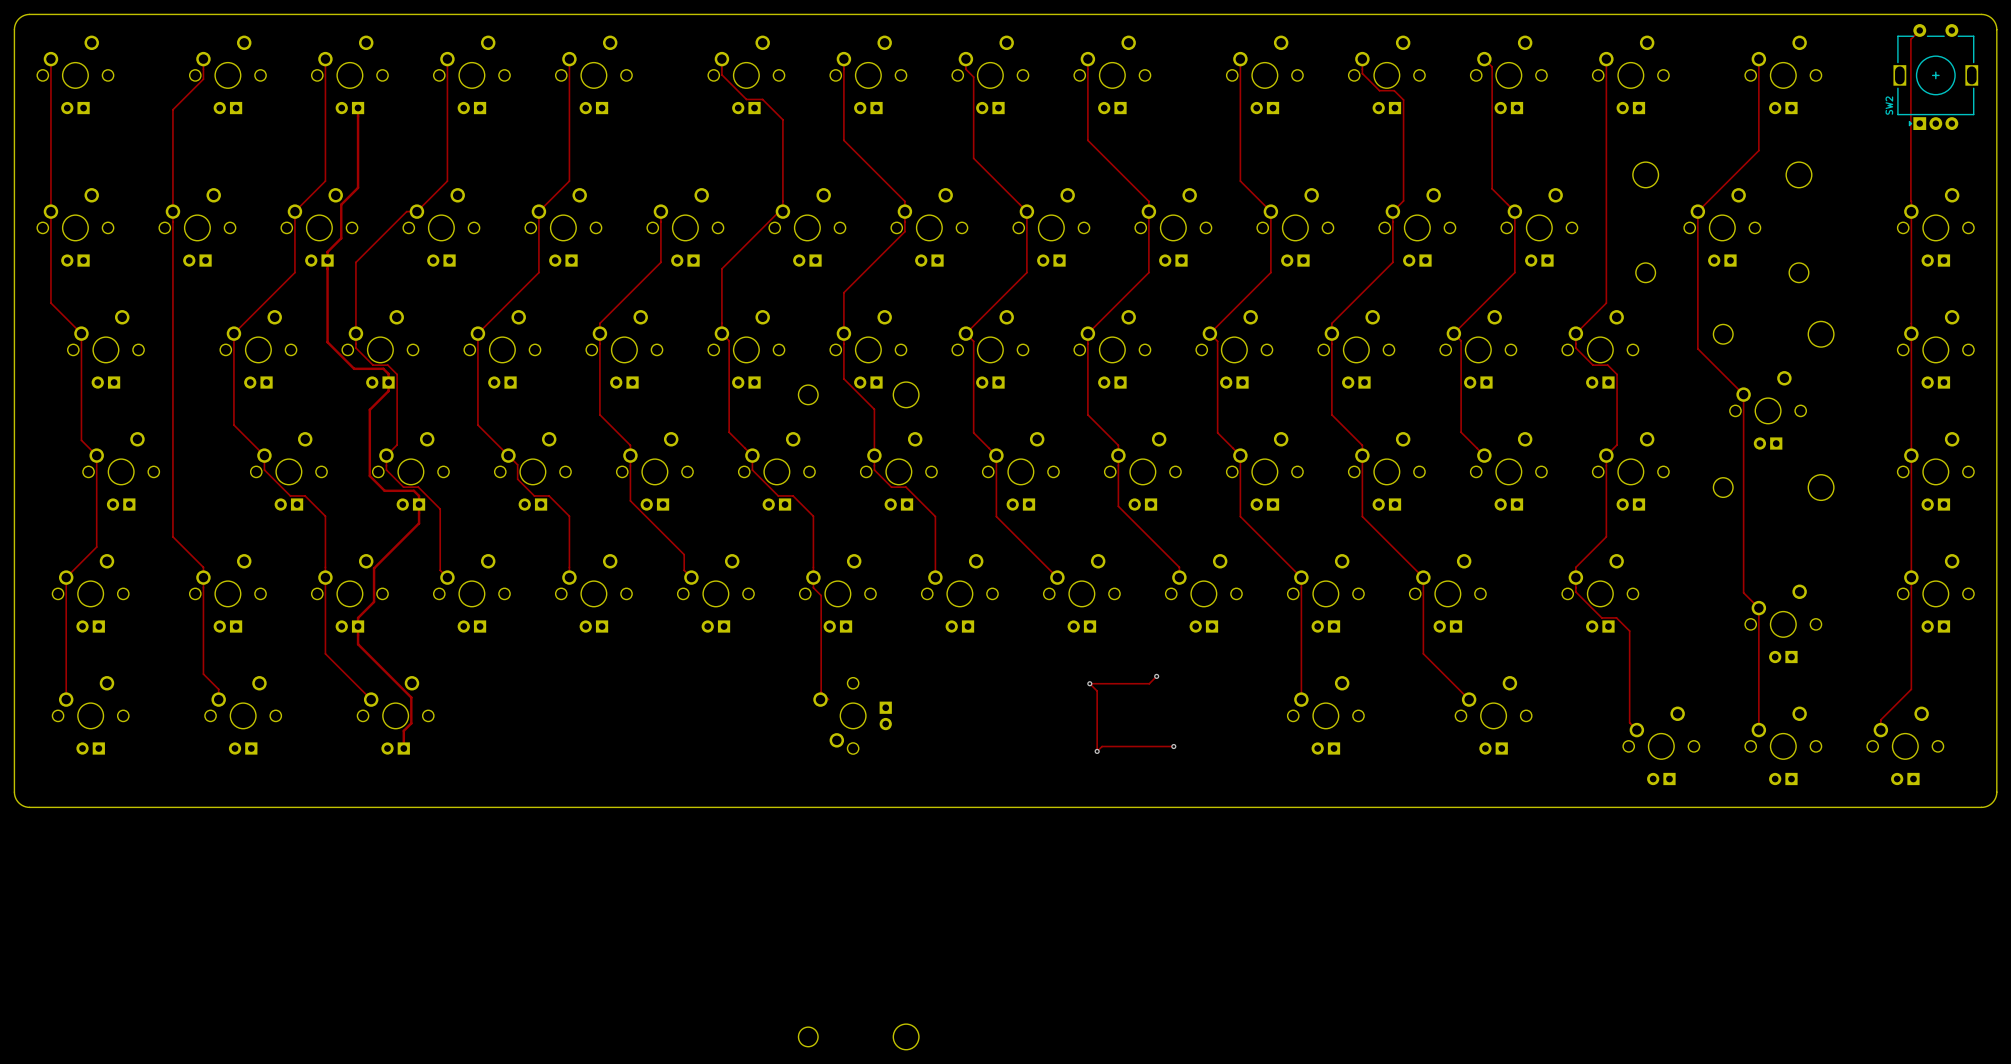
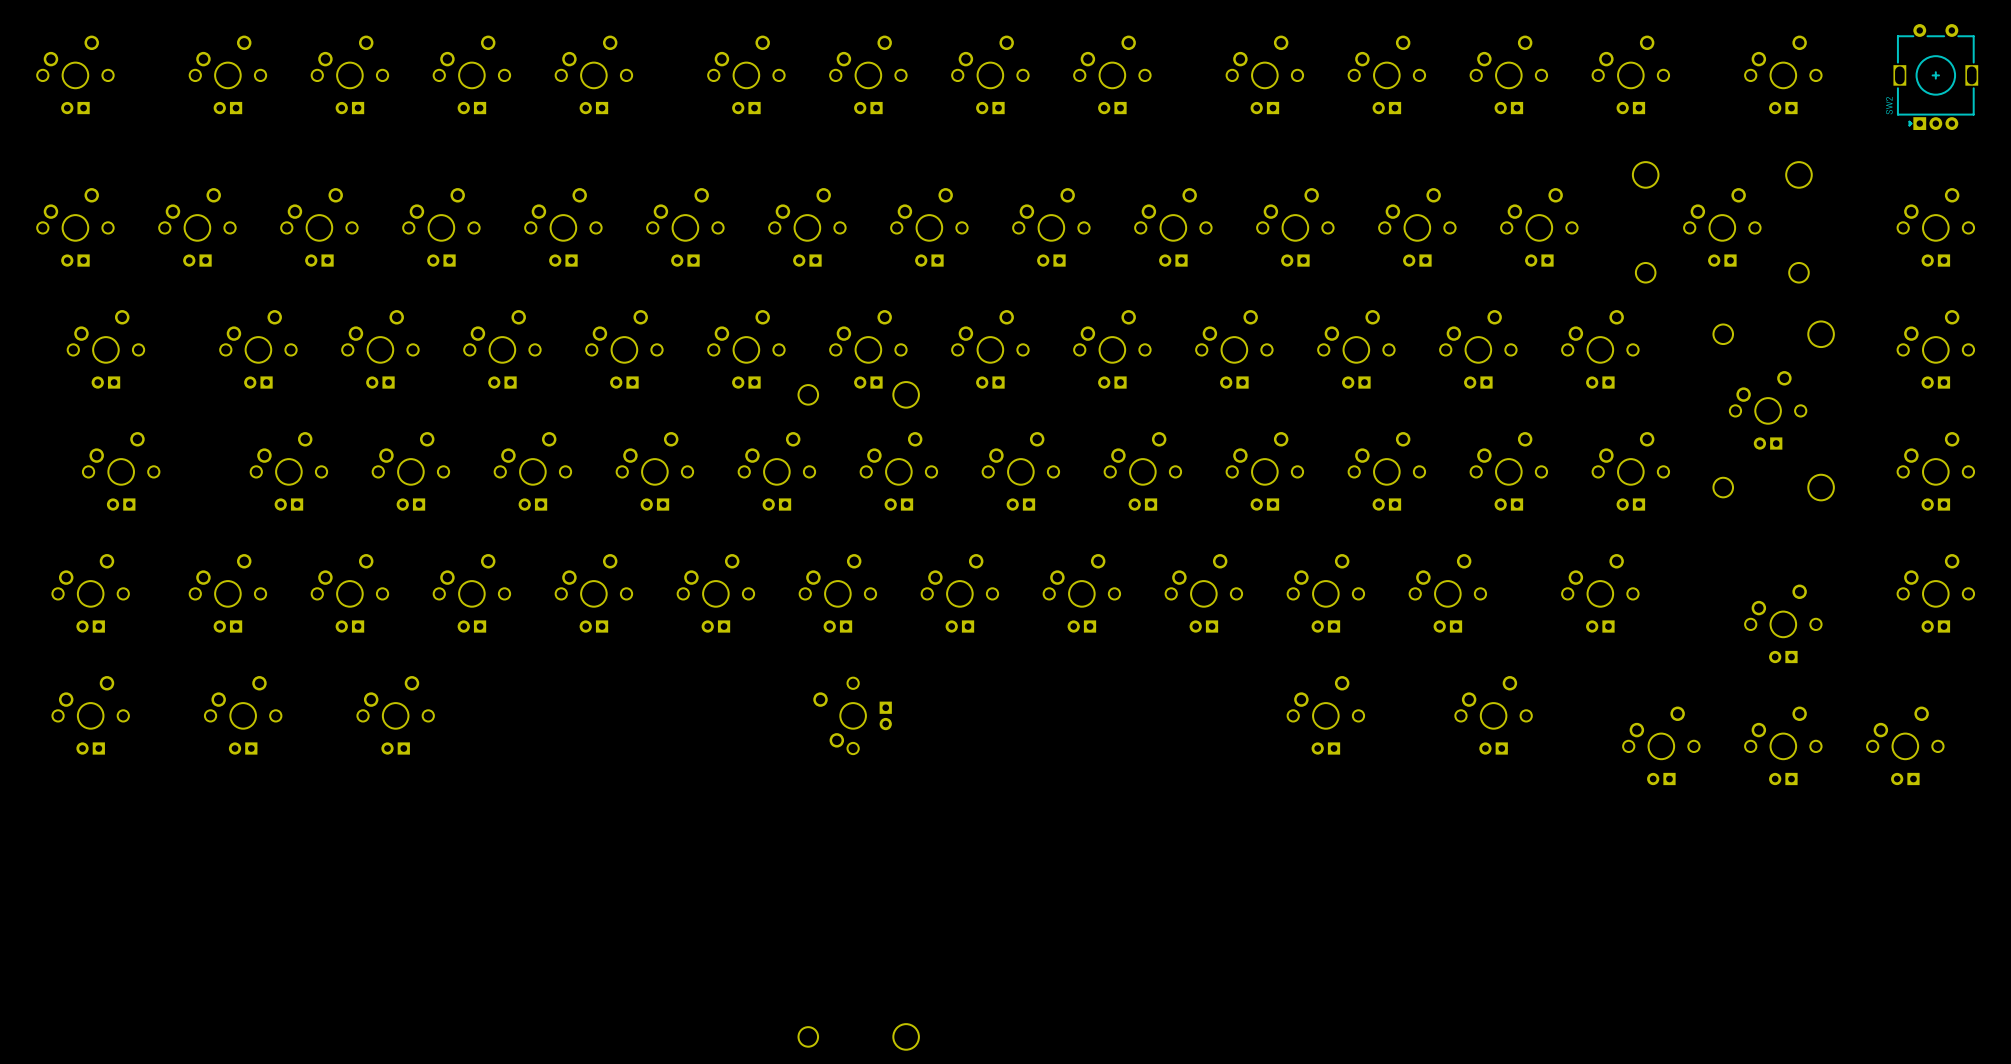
board edge: (29, 14) (1987, 15) (1994, 22) (1996, 29) (1995, 797) (1990, 804) (1981, 807) (23, 806) (17, 801) (14, 792) (14, 29) (18, 18) (29, 14) -> none
track: (1919, 30) (1910, 39) (1911, 689) (1880, 719) (1880, 730) -> none
track: (50, 59) (50, 303) (81, 333) (81, 440) (96, 455) (96, 547) (66, 577) (66, 699) -> none
track: (203, 59) (203, 79) (172, 109) (172, 536) (203, 567) (203, 674) (218, 689) (218, 699) -> none
track: (325, 59) (325, 181) (294, 211) (294, 272) (233, 333) (233, 425) (264, 455) (264, 470) (290, 495) (305, 495) (325, 516) (325, 653) (371, 699) -> none
track: (447, 59) (447, 181) (416, 211) (406, 211) (355, 262) (355, 348) (373, 365) (387, 365) (397, 374) (397, 444) (386, 455) (386, 470) (403, 487) (418, 487) (440, 509) (440, 570) (447, 577) -> none
track: (569, 59) (569, 181) (538, 211) (538, 272) (477, 333) (477, 425) (517, 464) (517, 479) (534, 495) (549, 495) (569, 516) (569, 577) -> none
track: (721, 59) (721, 74) (746, 99) (762, 99) (782, 119) (782, 211) (779, 211) (721, 268) (721, 333) (729, 340) (729, 432) (752, 455) (752, 470) (778, 495) (793, 495) (813, 516) (813, 587) (821, 595) (821, 692) (828, 699) -> none
track: (843, 59) (843, 140) (904, 201) (904, 231) (843, 292) (843, 378) (874, 409) (874, 470) (891, 487) (905, 487) (935, 516) (935, 577) -> none
track: (965, 59) (965, 69) (973, 77) (973, 158) (1026, 211) (1026, 272) (965, 333) (973, 341) (973, 432) (996, 455) (996, 516) (1057, 577) -> none
track: (1087, 59) (1087, 140) (1148, 201) (1148, 272) (1087, 333) (1087, 414) (1118, 445) (1118, 506) (1179, 567) (1179, 577) -> none
track: (1240, 59) (1240, 181) (1270, 211) (1270, 272) (1209, 333) (1217, 341) (1217, 432) (1240, 455) (1240, 516) (1301, 577) (1301, 699) -> none
track: (1362, 59) (1362, 73) (1379, 90) (1394, 90) (1403, 99) (1403, 200) (1392, 211) (1392, 262) (1331, 323) (1331, 414) (1362, 445) (1362, 516) (1423, 577) (1423, 653) (1469, 699) -> none
track: (1484, 59) (1492, 66) (1492, 188) (1514, 211) (1514, 272) (1453, 333) (1461, 340) (1461, 432) (1484, 455) -> none
track: (1606, 59) (1606, 303) (1575, 333) (1575, 348) (1593, 365) (1607, 365) (1617, 374) (1617, 444) (1606, 455) (1606, 536) (1575, 567) (1575, 591) (1601, 617) (1616, 617) (1629, 631) (1629, 722) (1636, 730) -> none
track: (1758, 59) (1758, 150) (1697, 211) (1697, 348) (1743, 394) (1743, 592) (1758, 608) (1758, 730) -> none
track: (358, 108) (358, 187) (341, 204) (341, 238) (327, 251) (327, 342) (354, 368) (383, 368) (388, 373) (388, 391) (369, 409) (369, 475) (384, 490) (413, 490) (419, 495) (419, 523) (374, 568) (374, 601) (358, 617) (358, 644) (411, 697) (411, 723) (403, 730) (403, 748) -> none
track: (660, 211) (660, 262) (599, 323) (599, 414) (630, 445) (630, 500) (684, 554) (684, 570) (691, 577) -> none
track: (1156, 676) (1149, 683) (1089, 683) (1097, 691) (1097, 751) (1102, 746) (1173, 746) -> none
via: (1156, 676) -> none
via: (1089, 683) -> none
via: (1173, 746) -> none
via: (1097, 751) -> none

